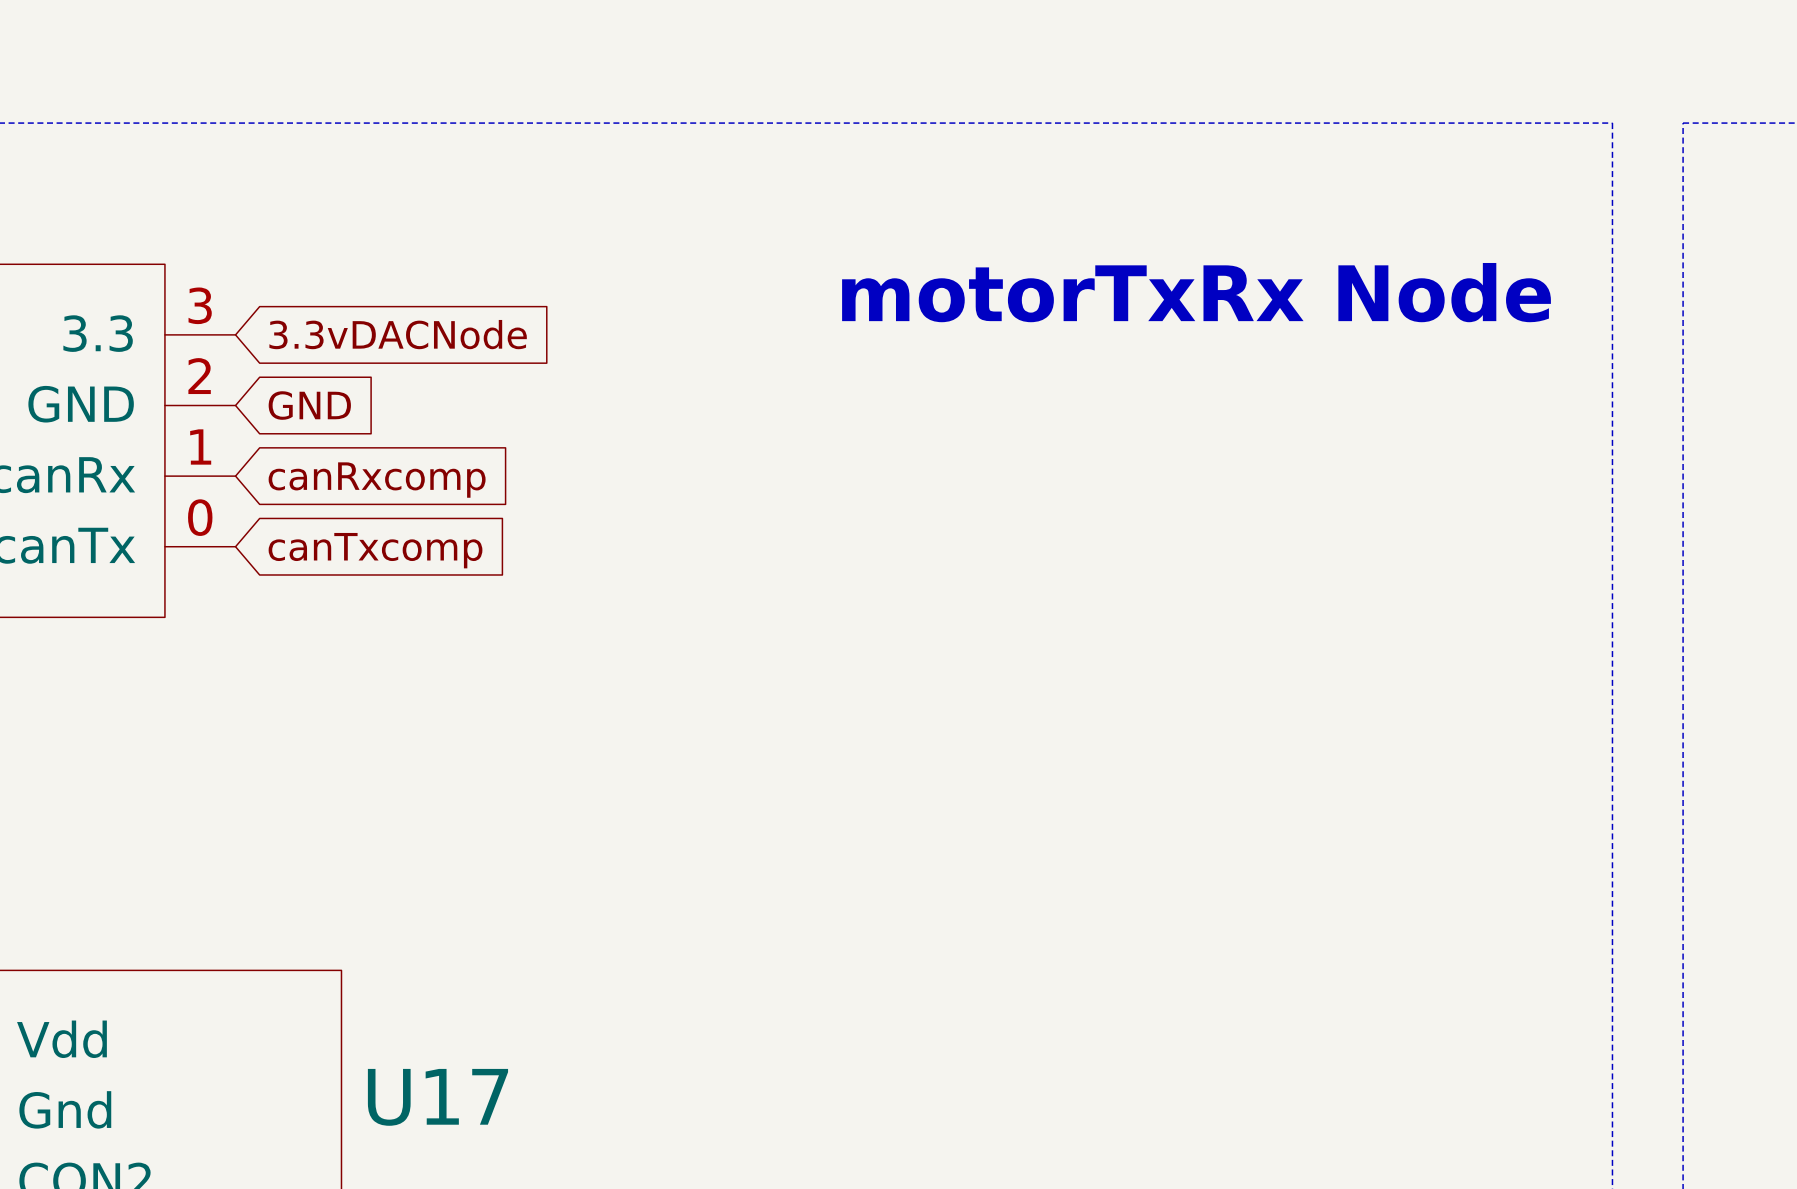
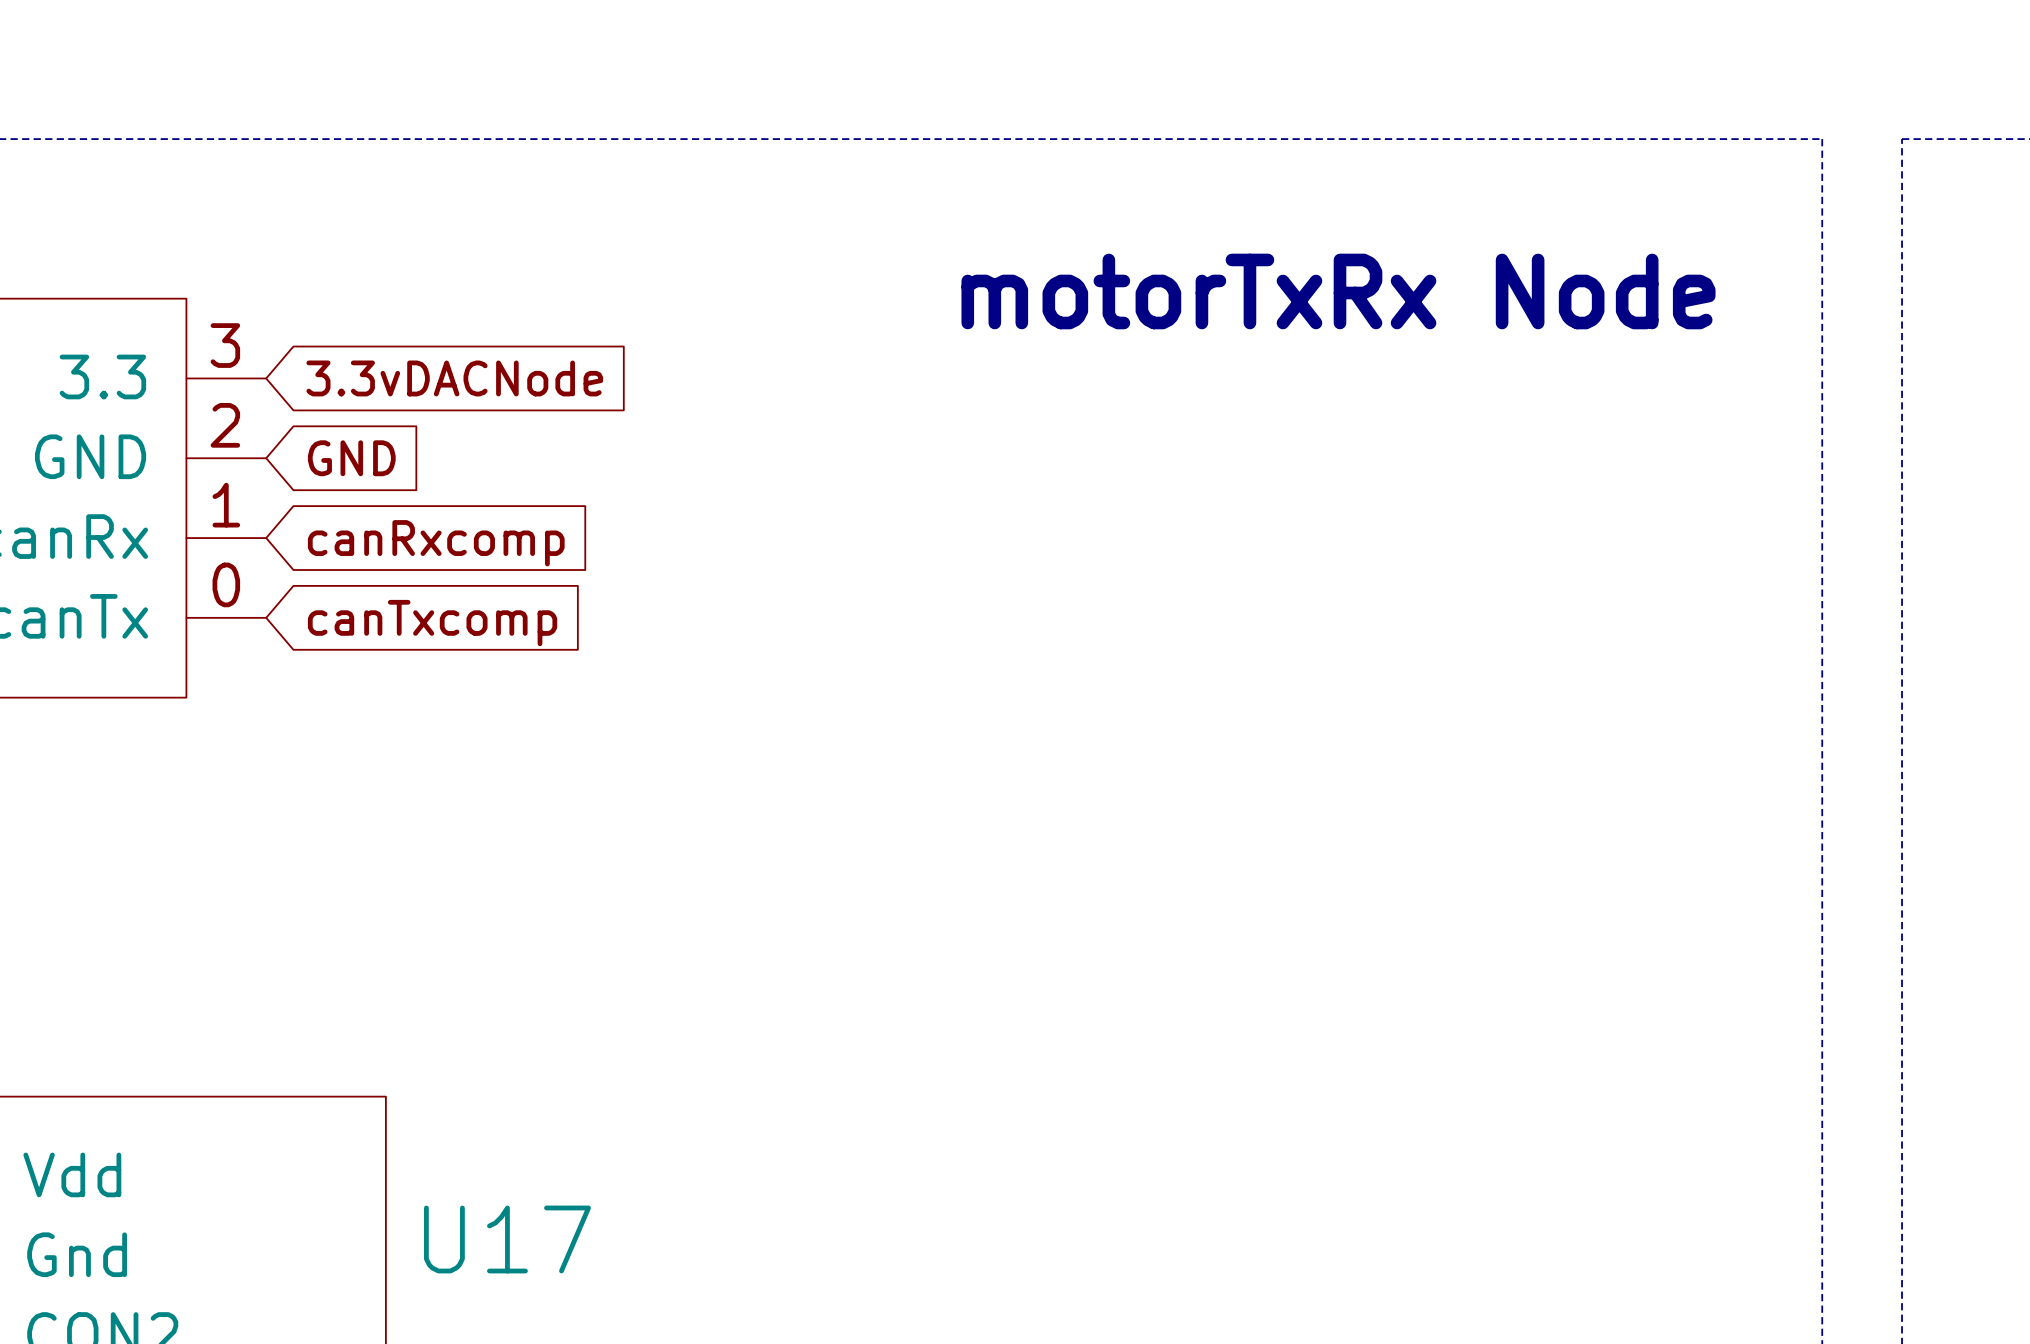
text position: motorTxRx Node (1196, 292) -> motorTxRx Node (1338, 291)

